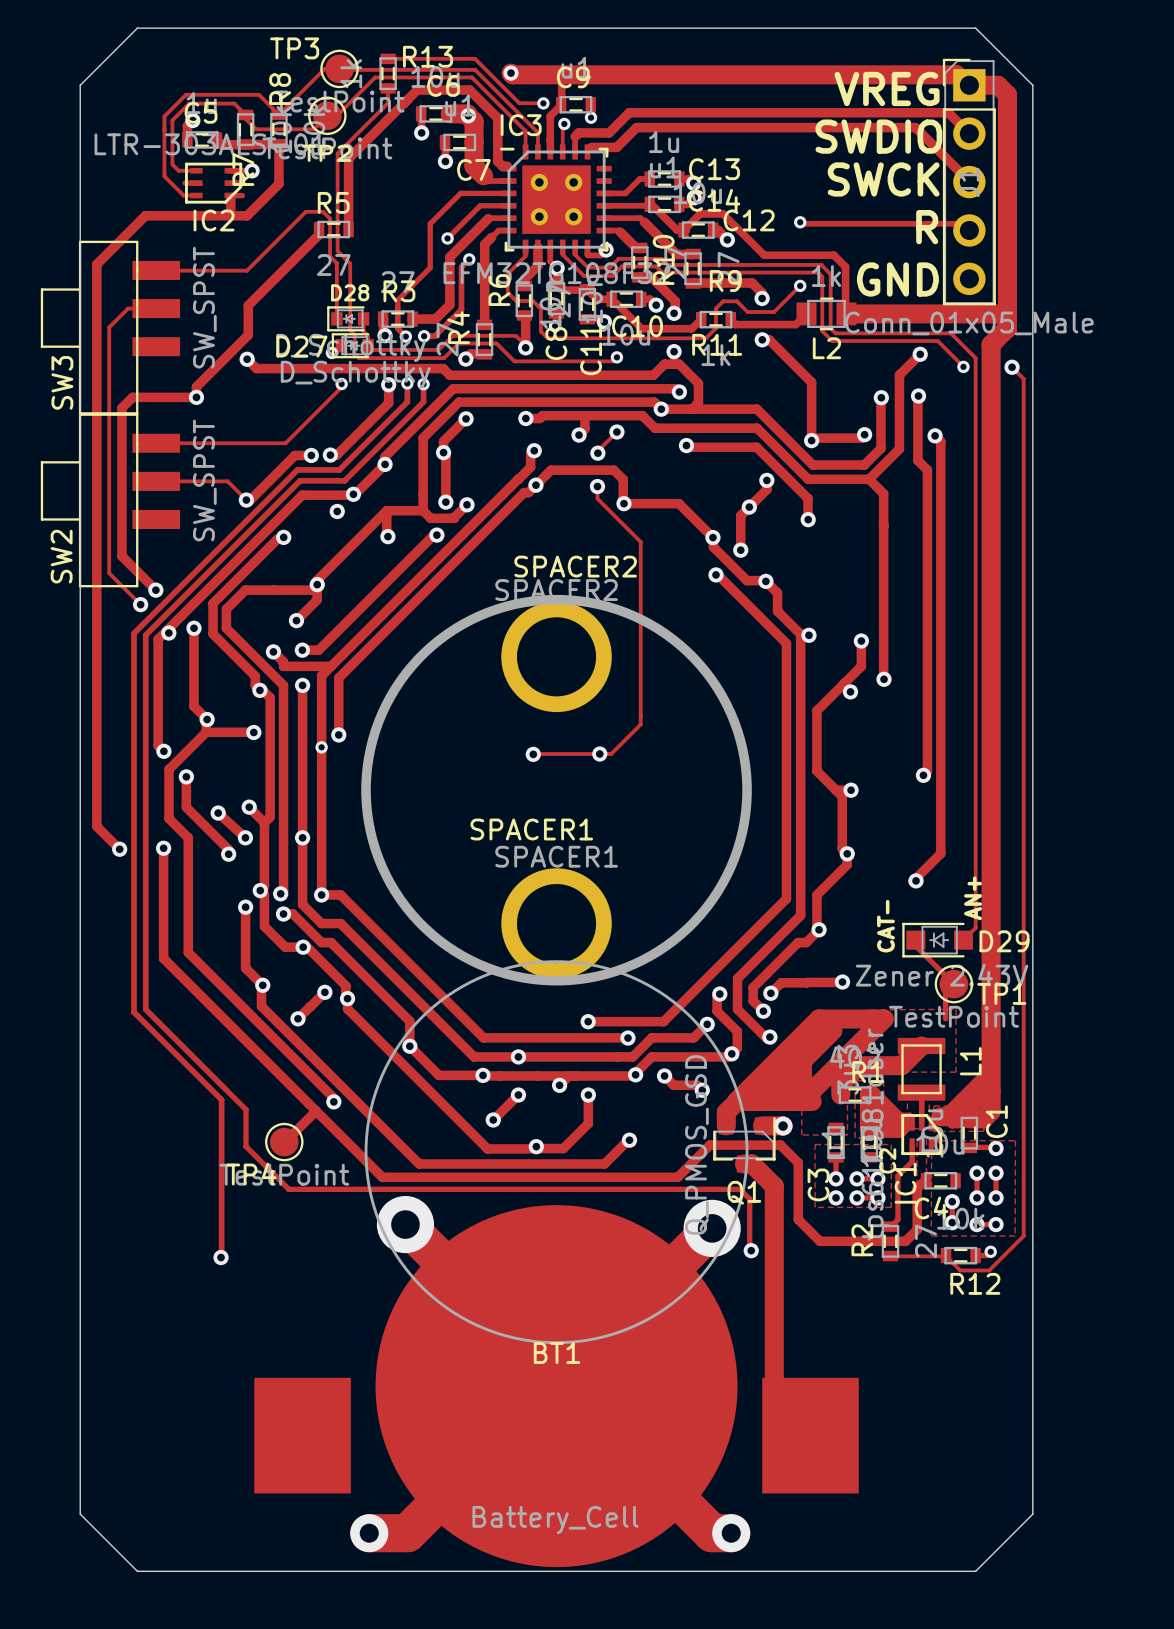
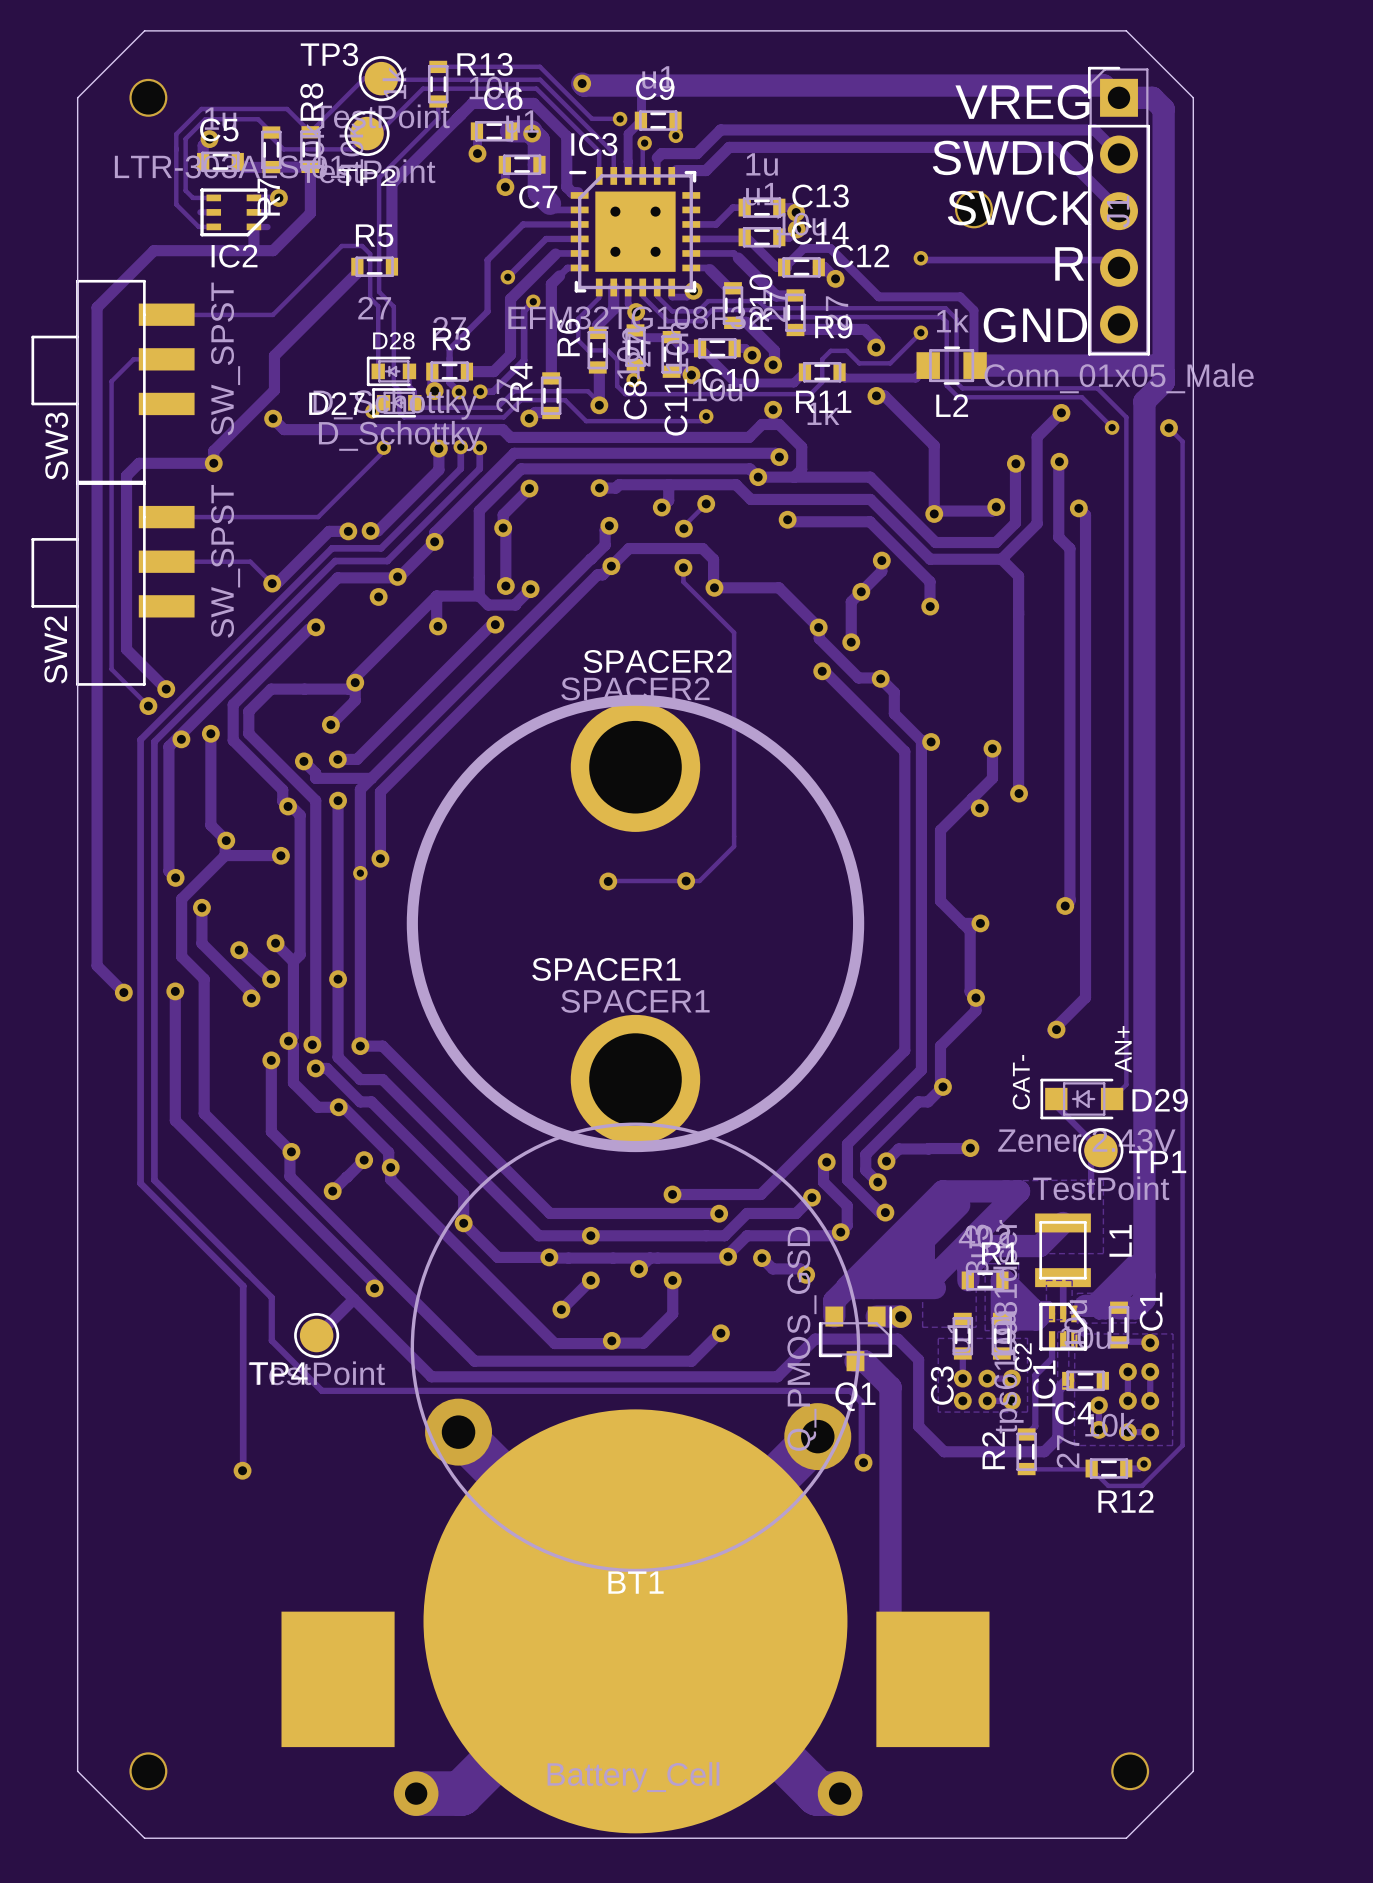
via: none -> (148, 97)
via: none -> (973, 209)
via: none -> (148, 1771)
via: none -> (1130, 1771)

